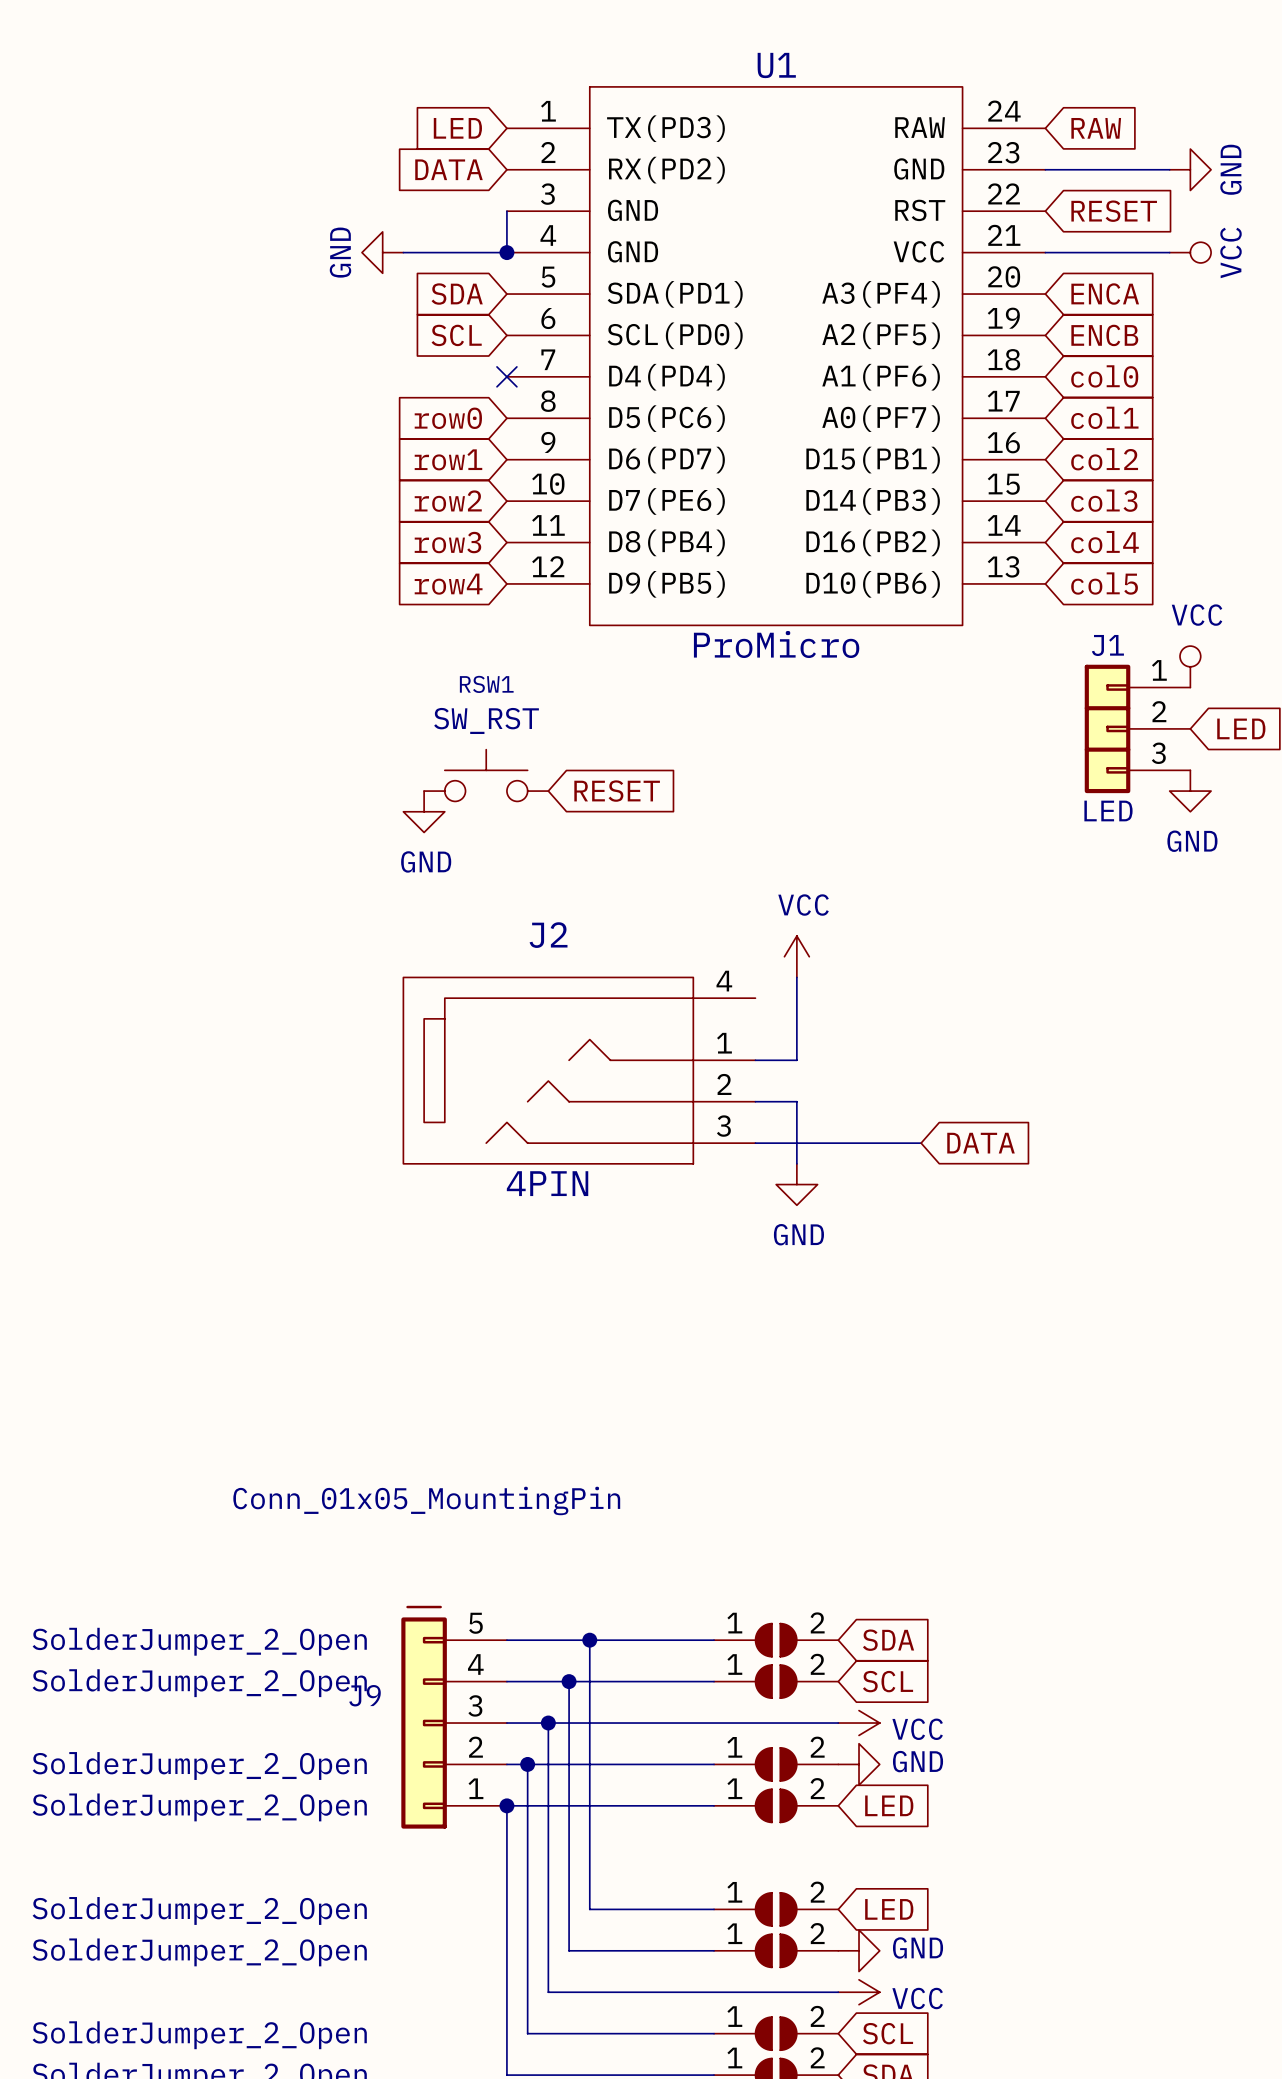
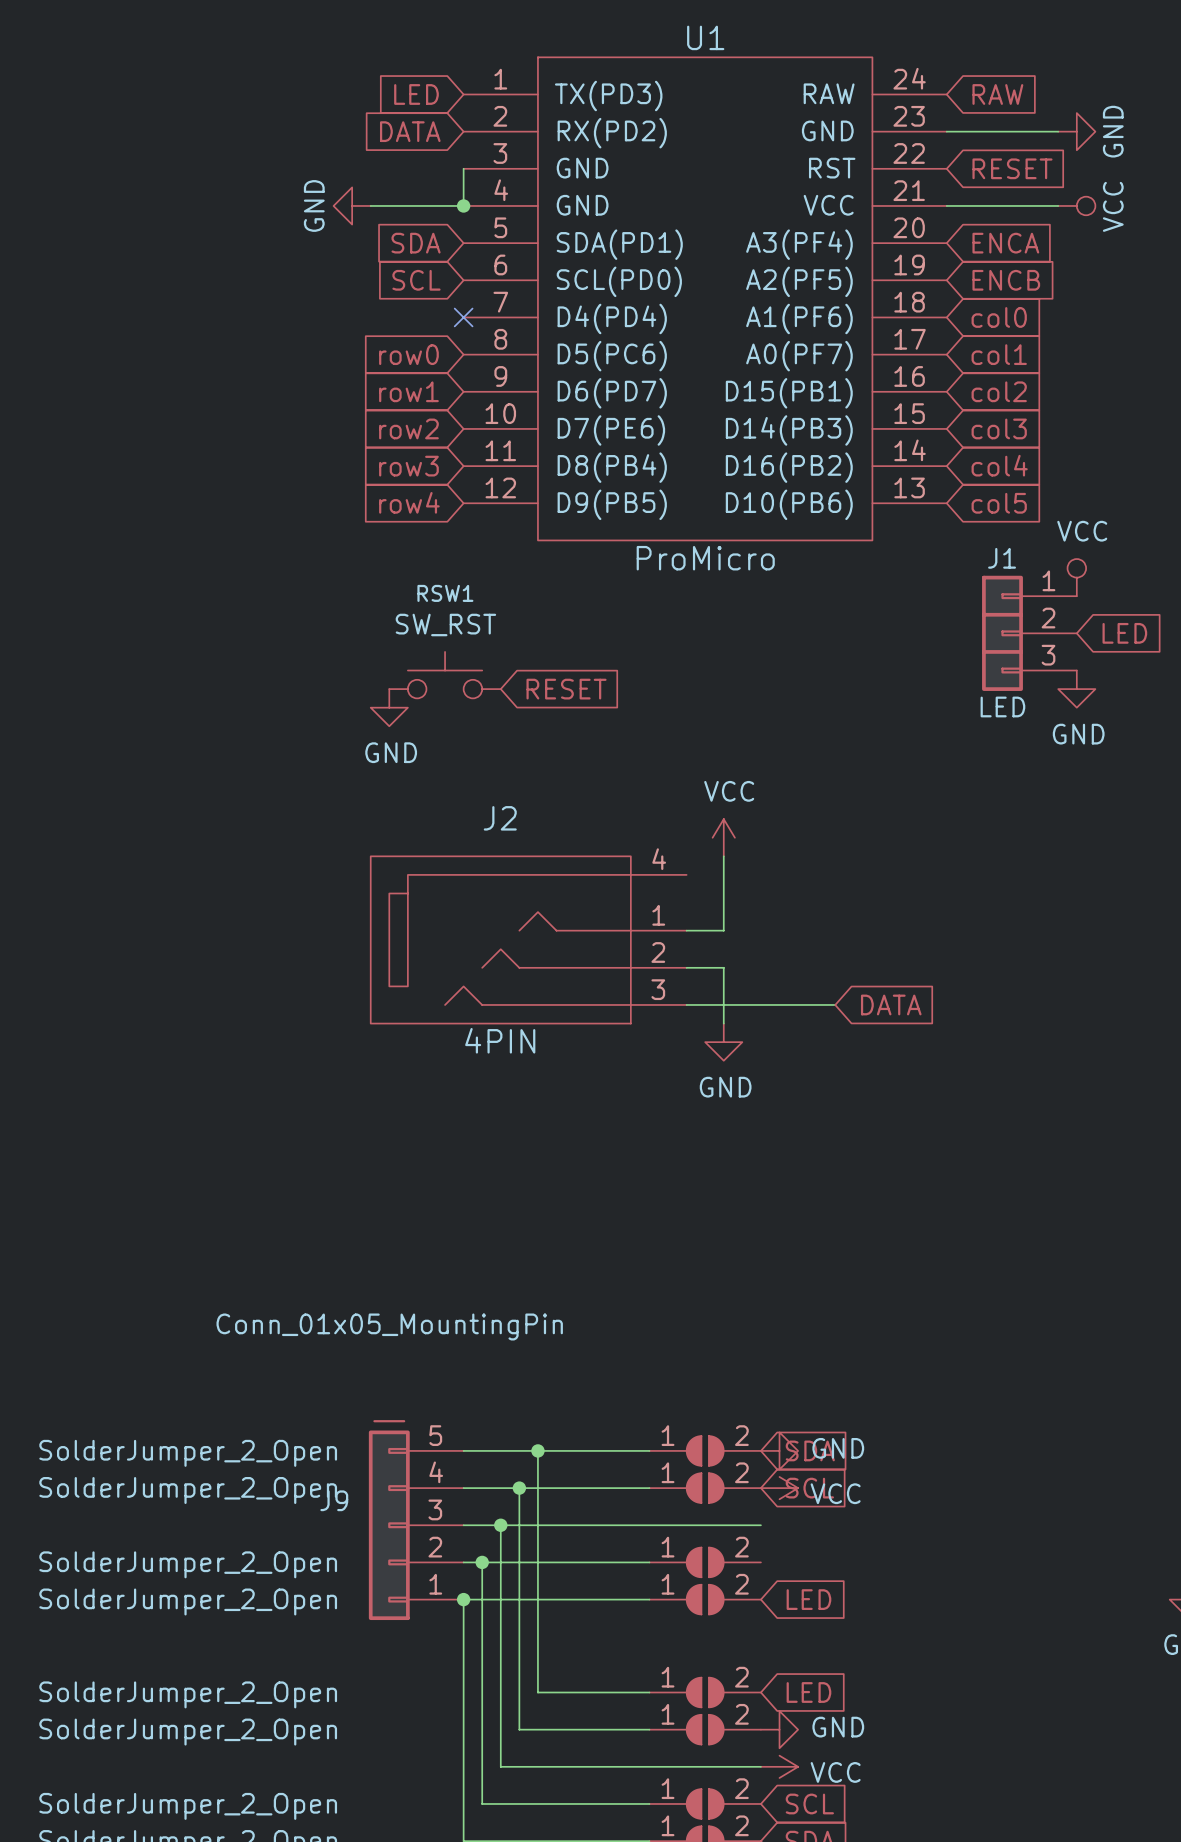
power symbol position: VCC (859, 1723) -> VCC (779, 1488)
power symbol position: GND (859, 1764) -> GND (779, 1450)

